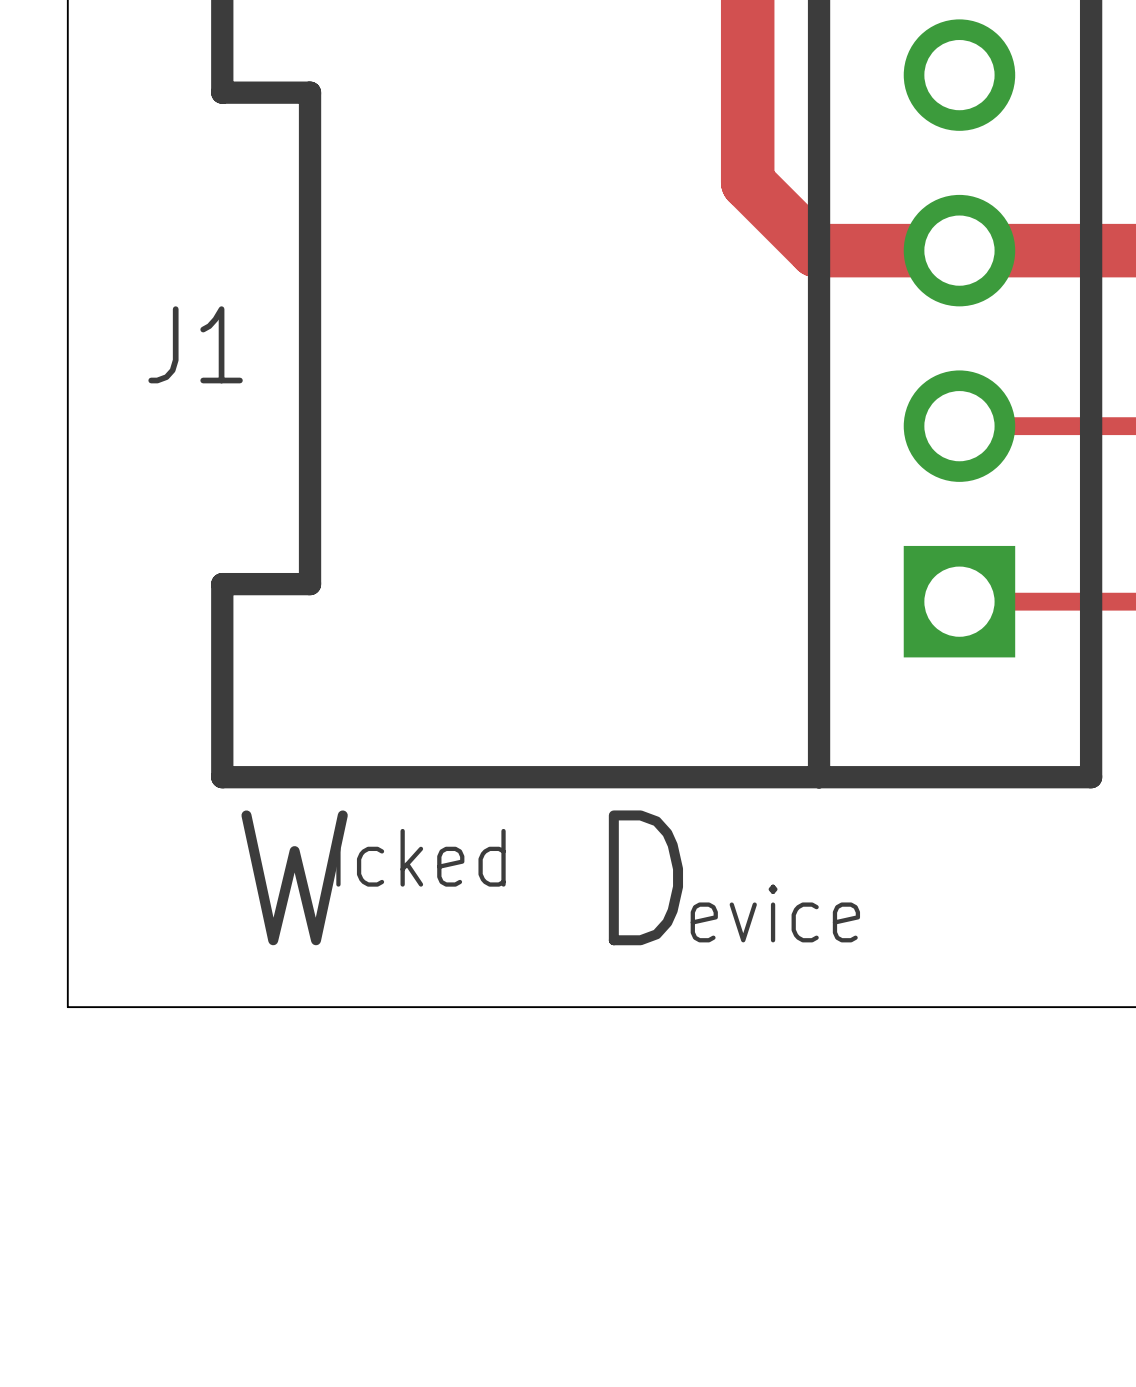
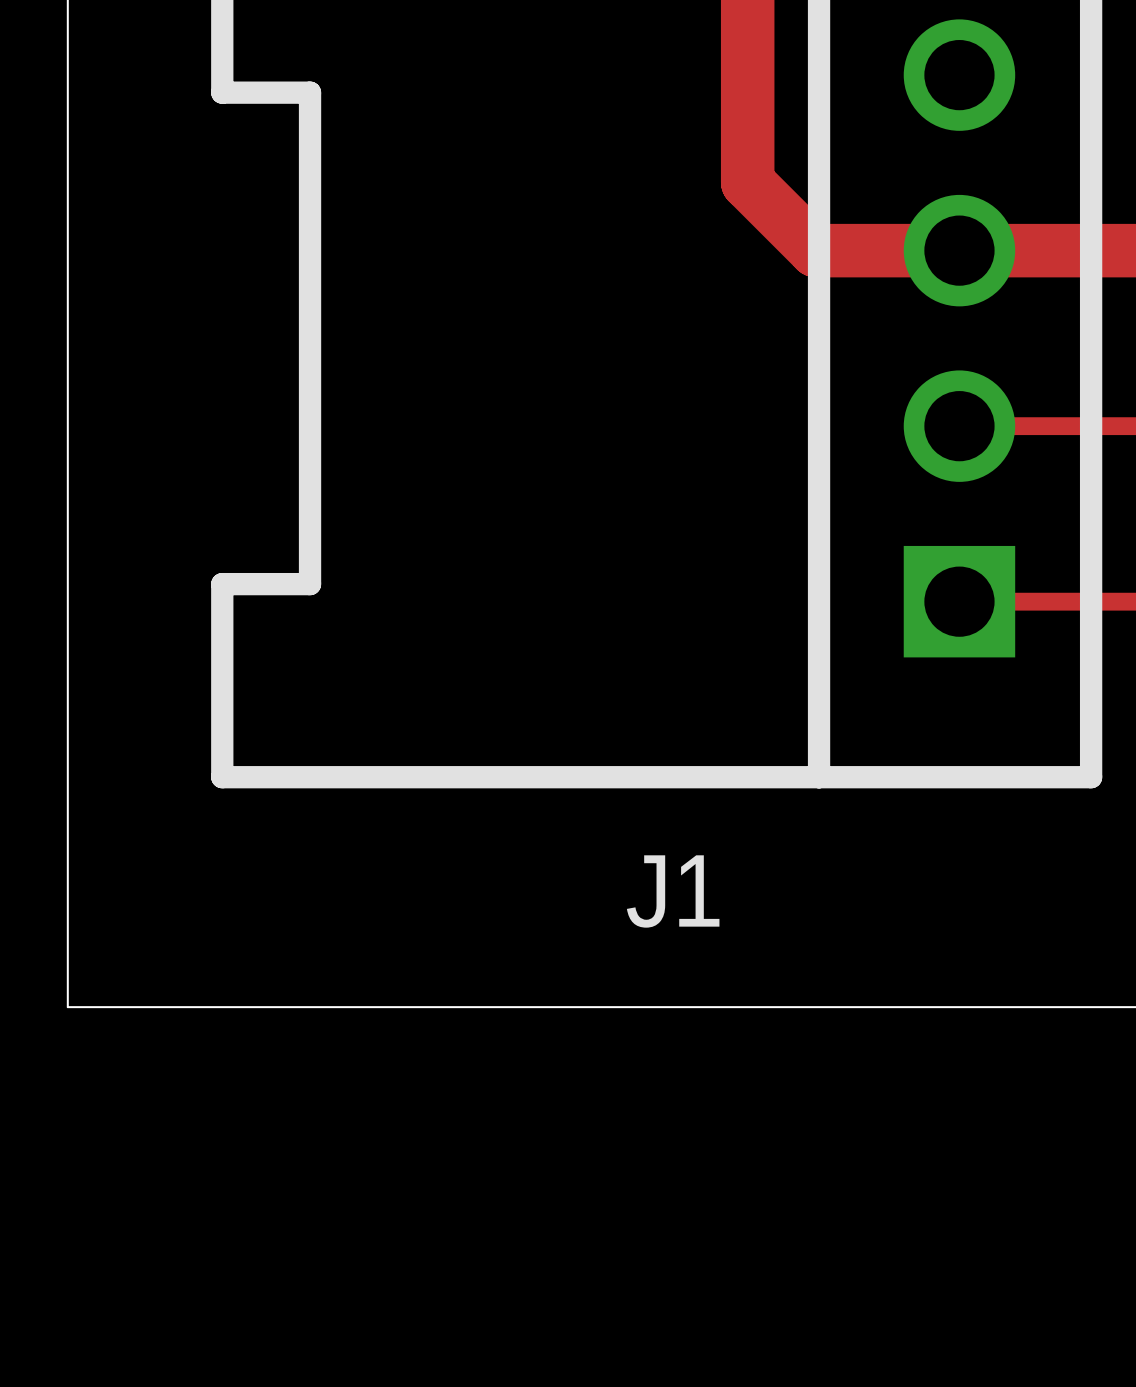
J1 name position: J1 (195, 344) -> J1 (673, 891)
text: icked (419, 857) -> none
text: W (294, 877) -> none
text: D (645, 877) -> none
text: evice (775, 913) -> none

